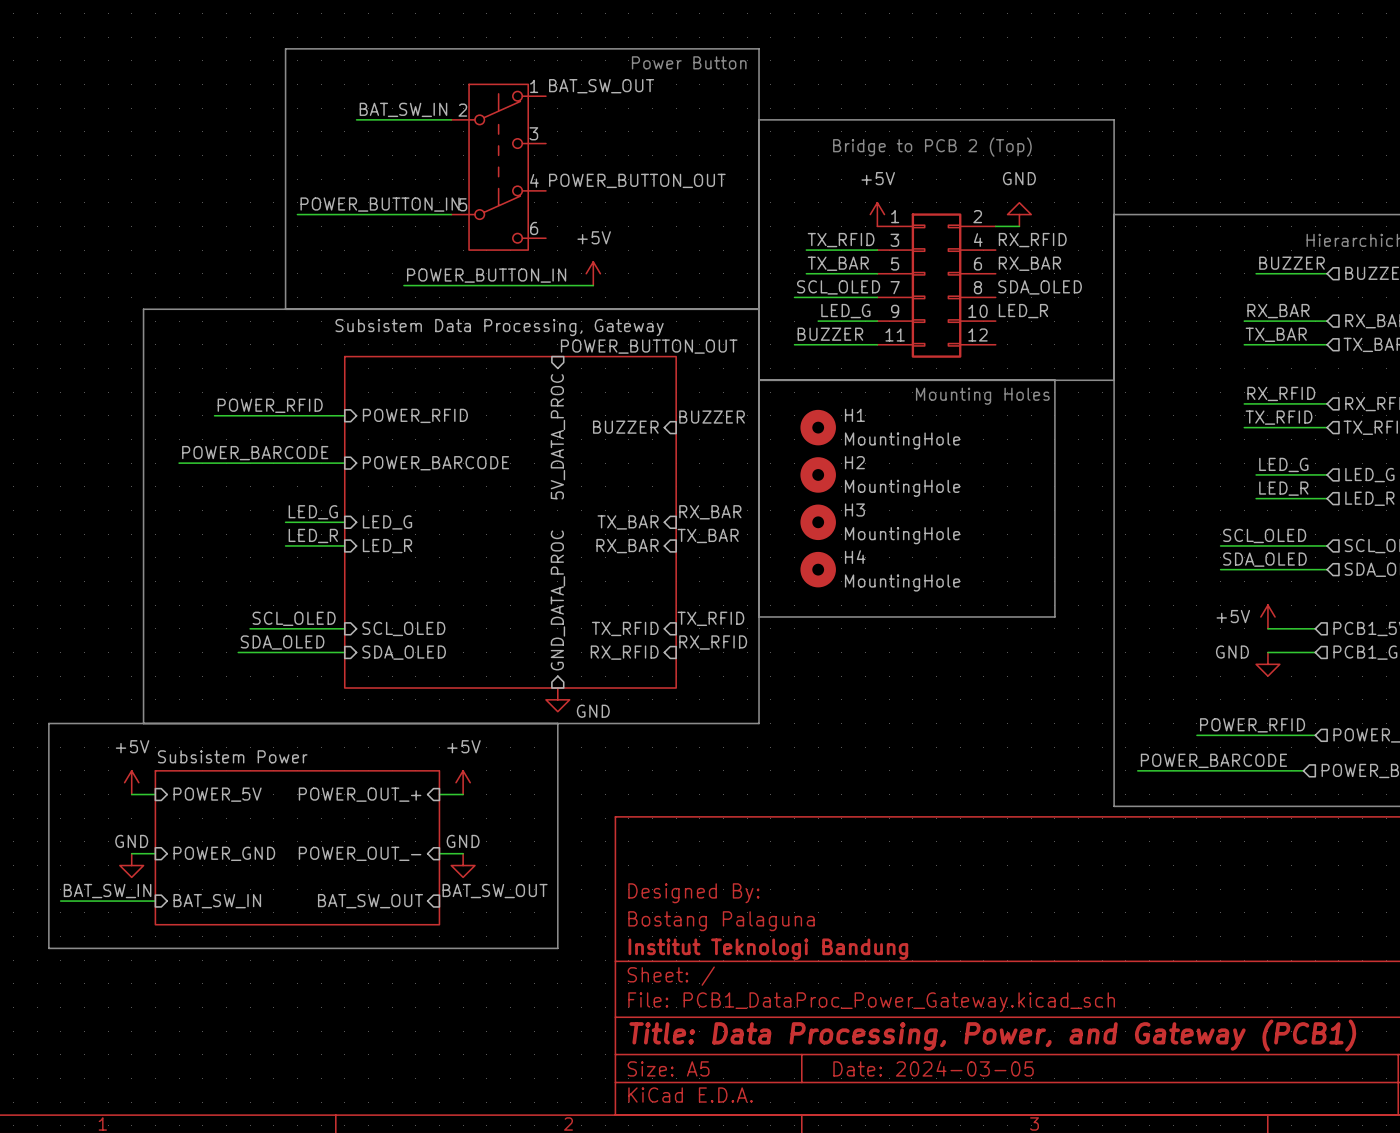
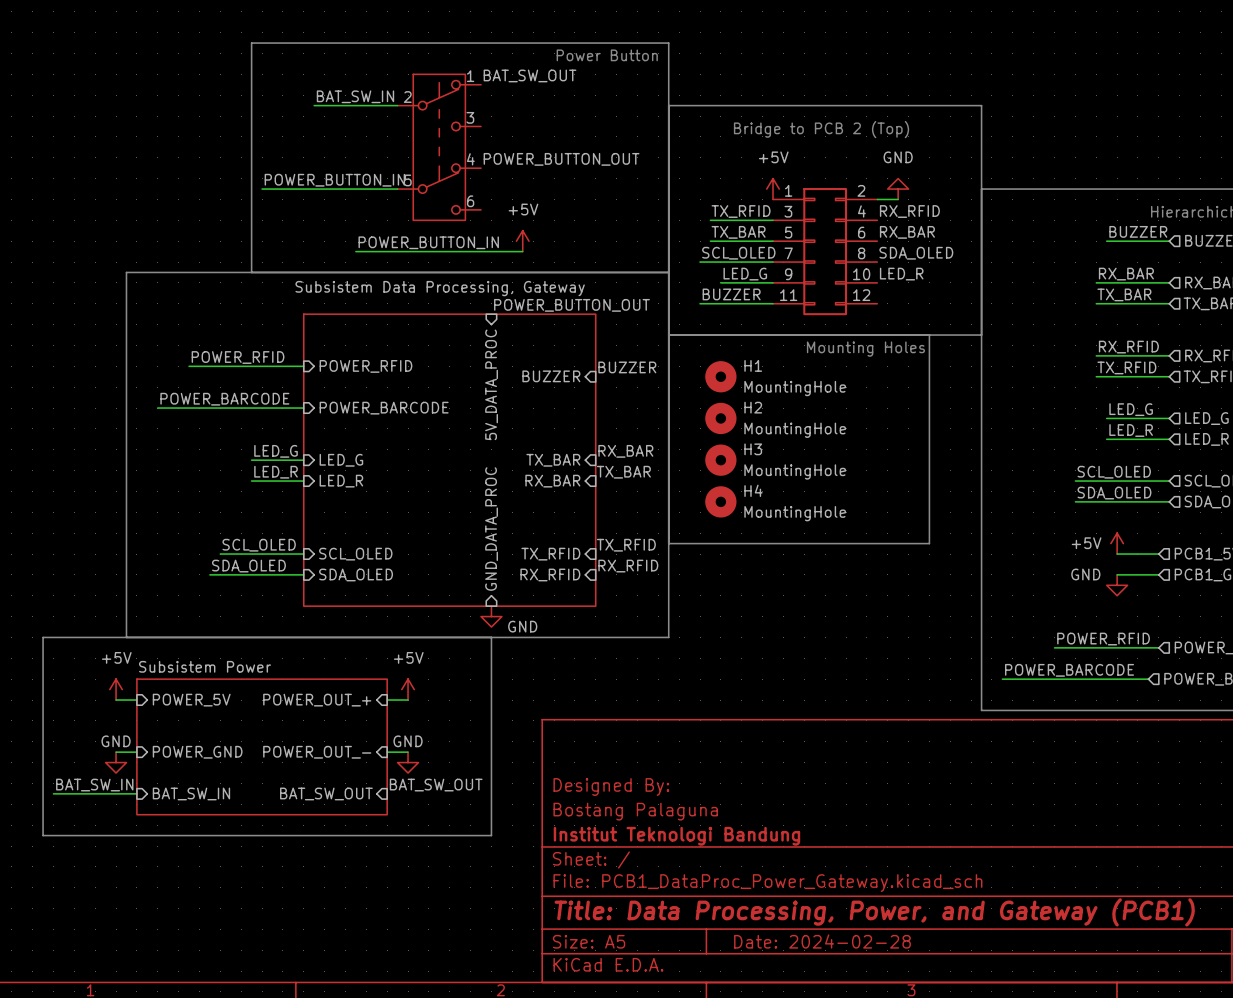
title block: Date: 2024-03-05 (933, 1068) -> Date: 2024-02-28 (822, 941)

